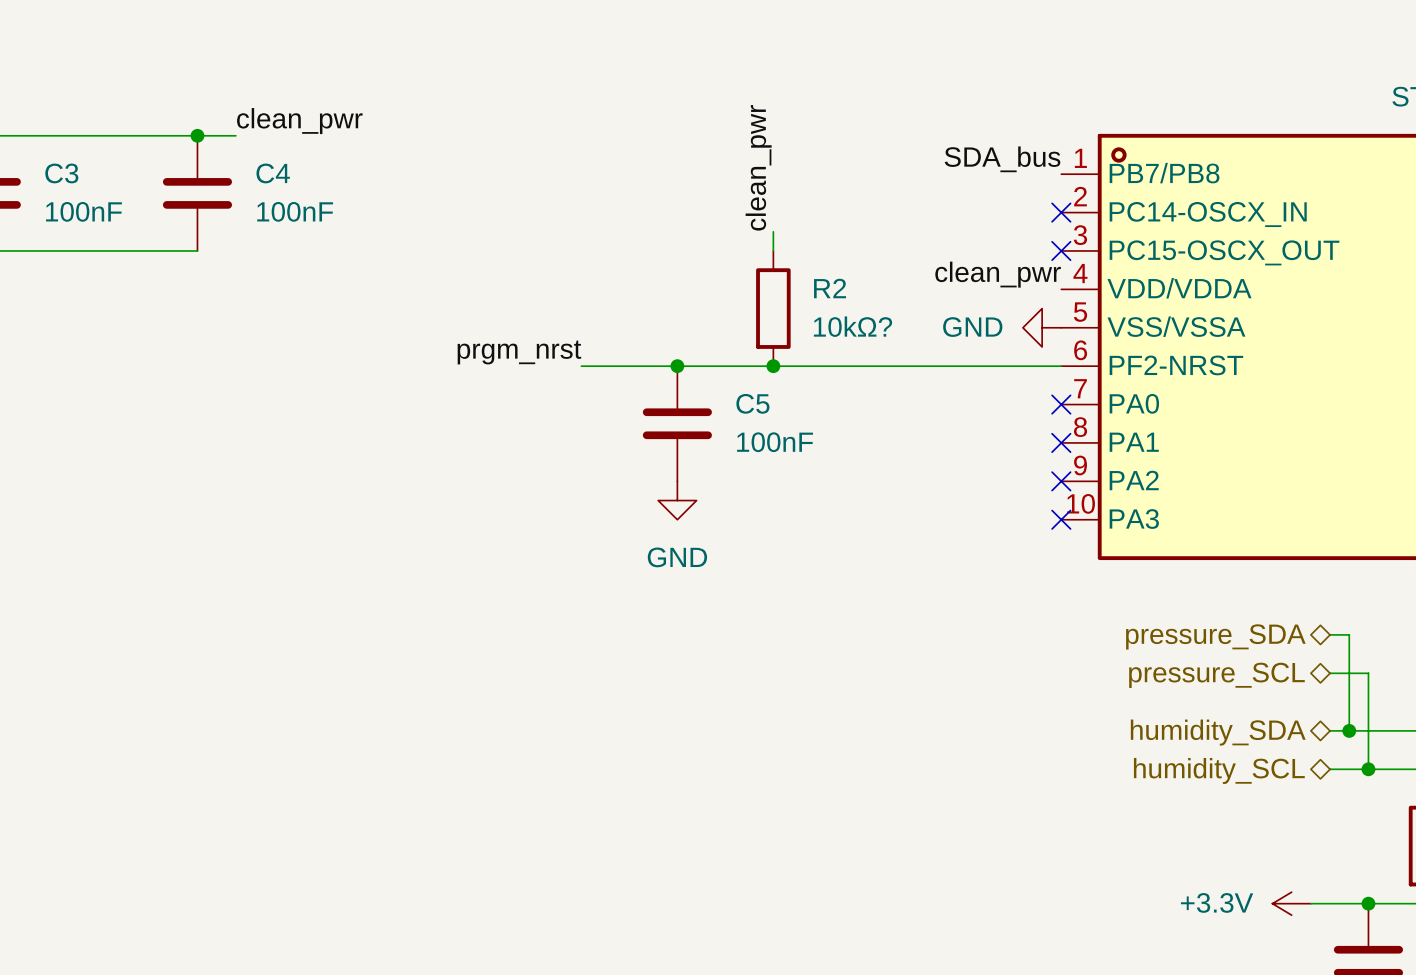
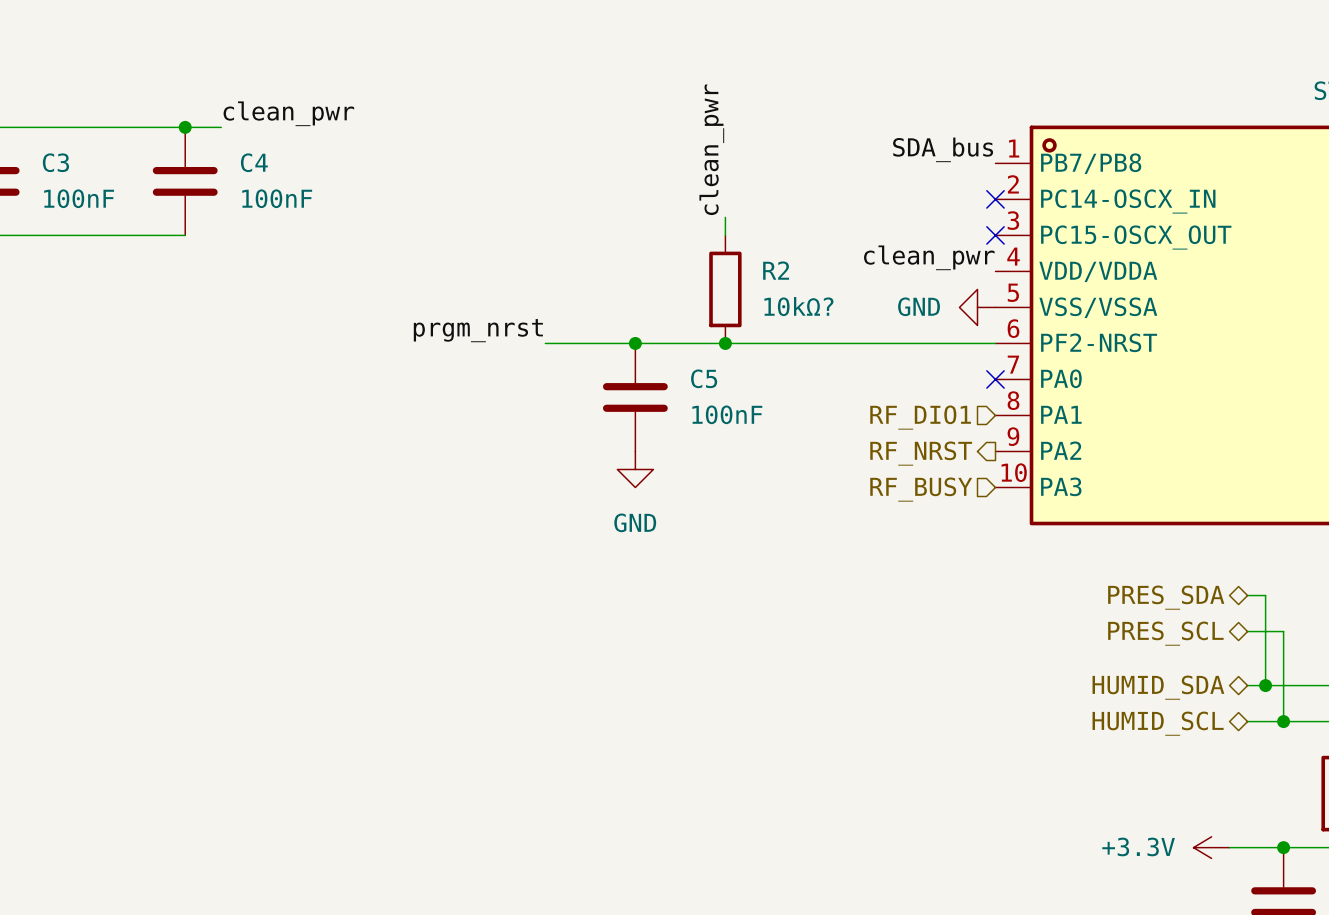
no-connect mark: (1061, 442) -> none
hierarchical label: none -> RF_DIO1 (920, 417)
no-connect mark: (1061, 481) -> none
hierarchical label: none -> RF_NRST (921, 453)
no-connect mark: (1061, 519) -> none
hierarchical label: none -> RF_BUSY (921, 489)
hierarchical label: pressure_SDA (1215, 636) -> PRES_SDA (1166, 597)
hierarchical label: pressure_SCL (1216, 675) -> PRES_SCL (1165, 633)
hierarchical label: humidity_SDA (1218, 732) -> HUMID_SDA (1158, 687)
hierarchical label: humidity_SCL (1219, 770) -> HUMID_SCL (1158, 723)

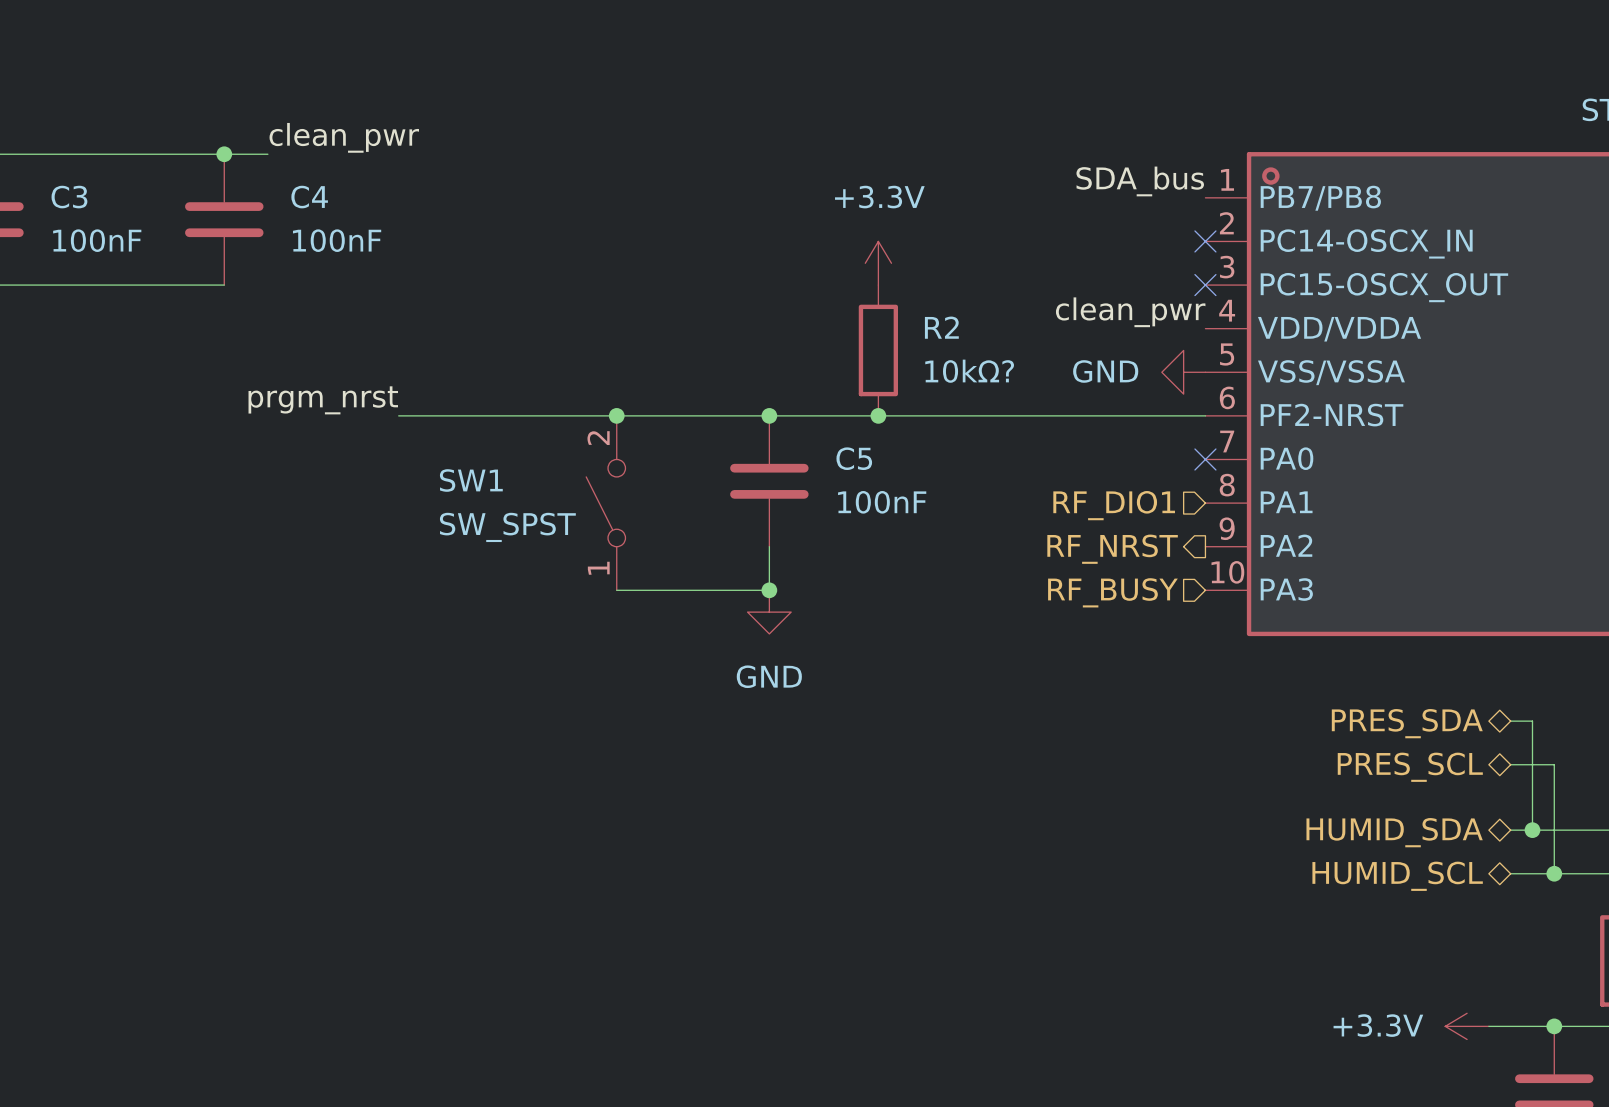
label: clean_pwr (711, 149) -> none
power symbol: none -> +3.3V (878, 263)
label position: prgm_nrst (478, 330) -> prgm_nrst (323, 400)
wire: none -> (398, 415) (660, 415)
junction: none -> (616, 415)
SW1: none -> SW_SPST (605, 503)
wire: none -> (769, 546) (769, 590) (616, 590)
power symbol position: GND (635, 469) -> GND (769, 612)
junction: none -> (769, 590)

